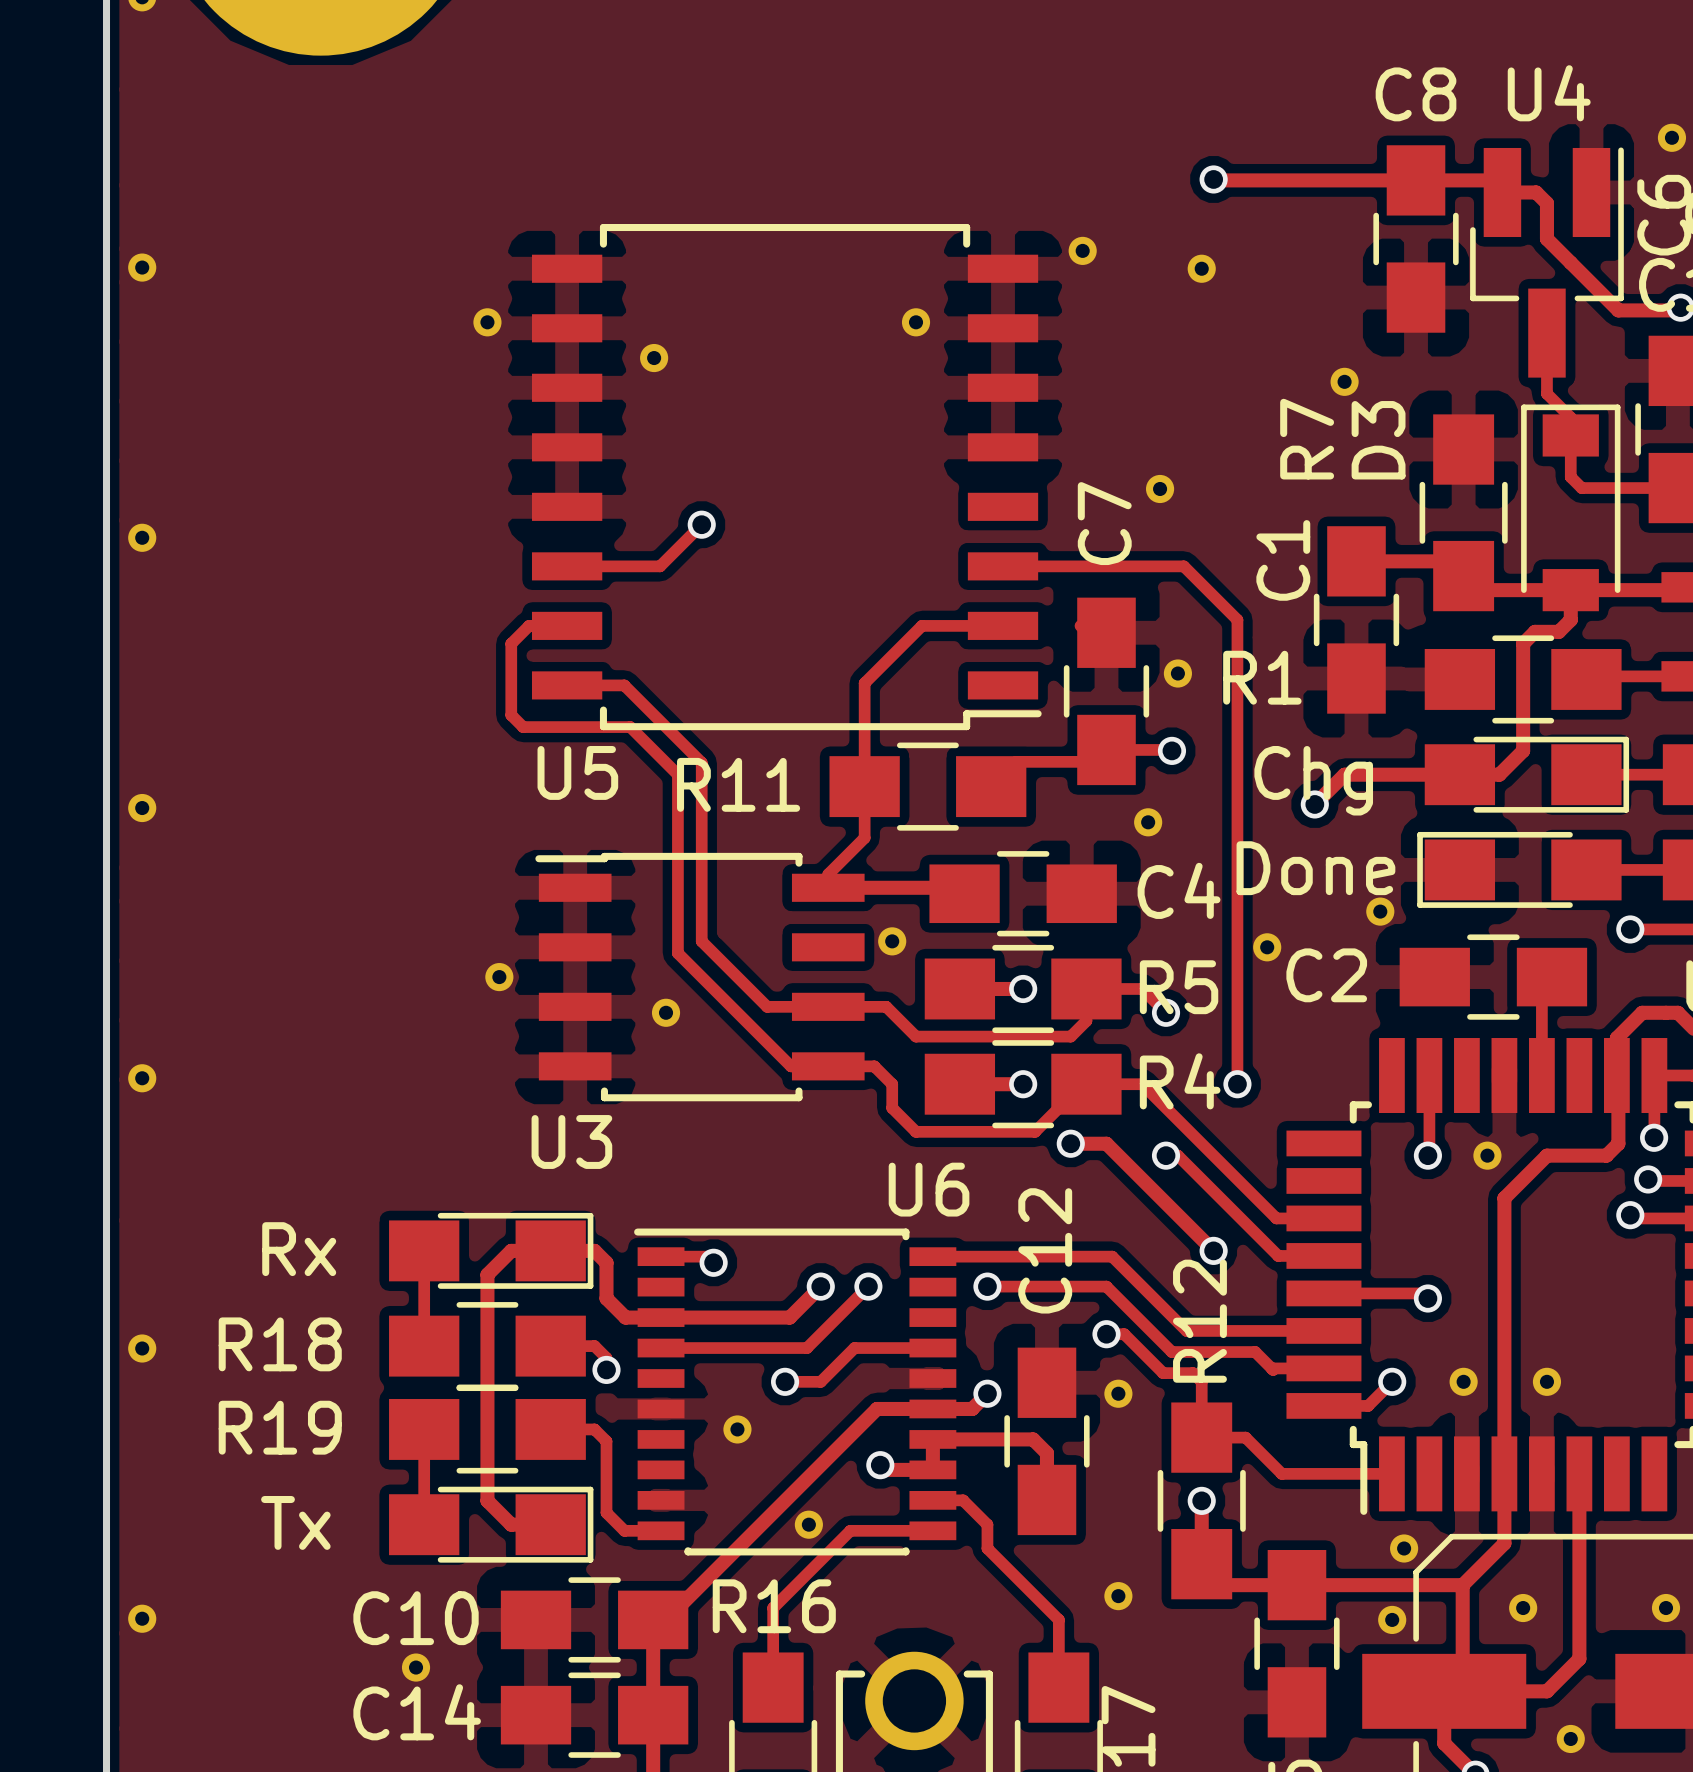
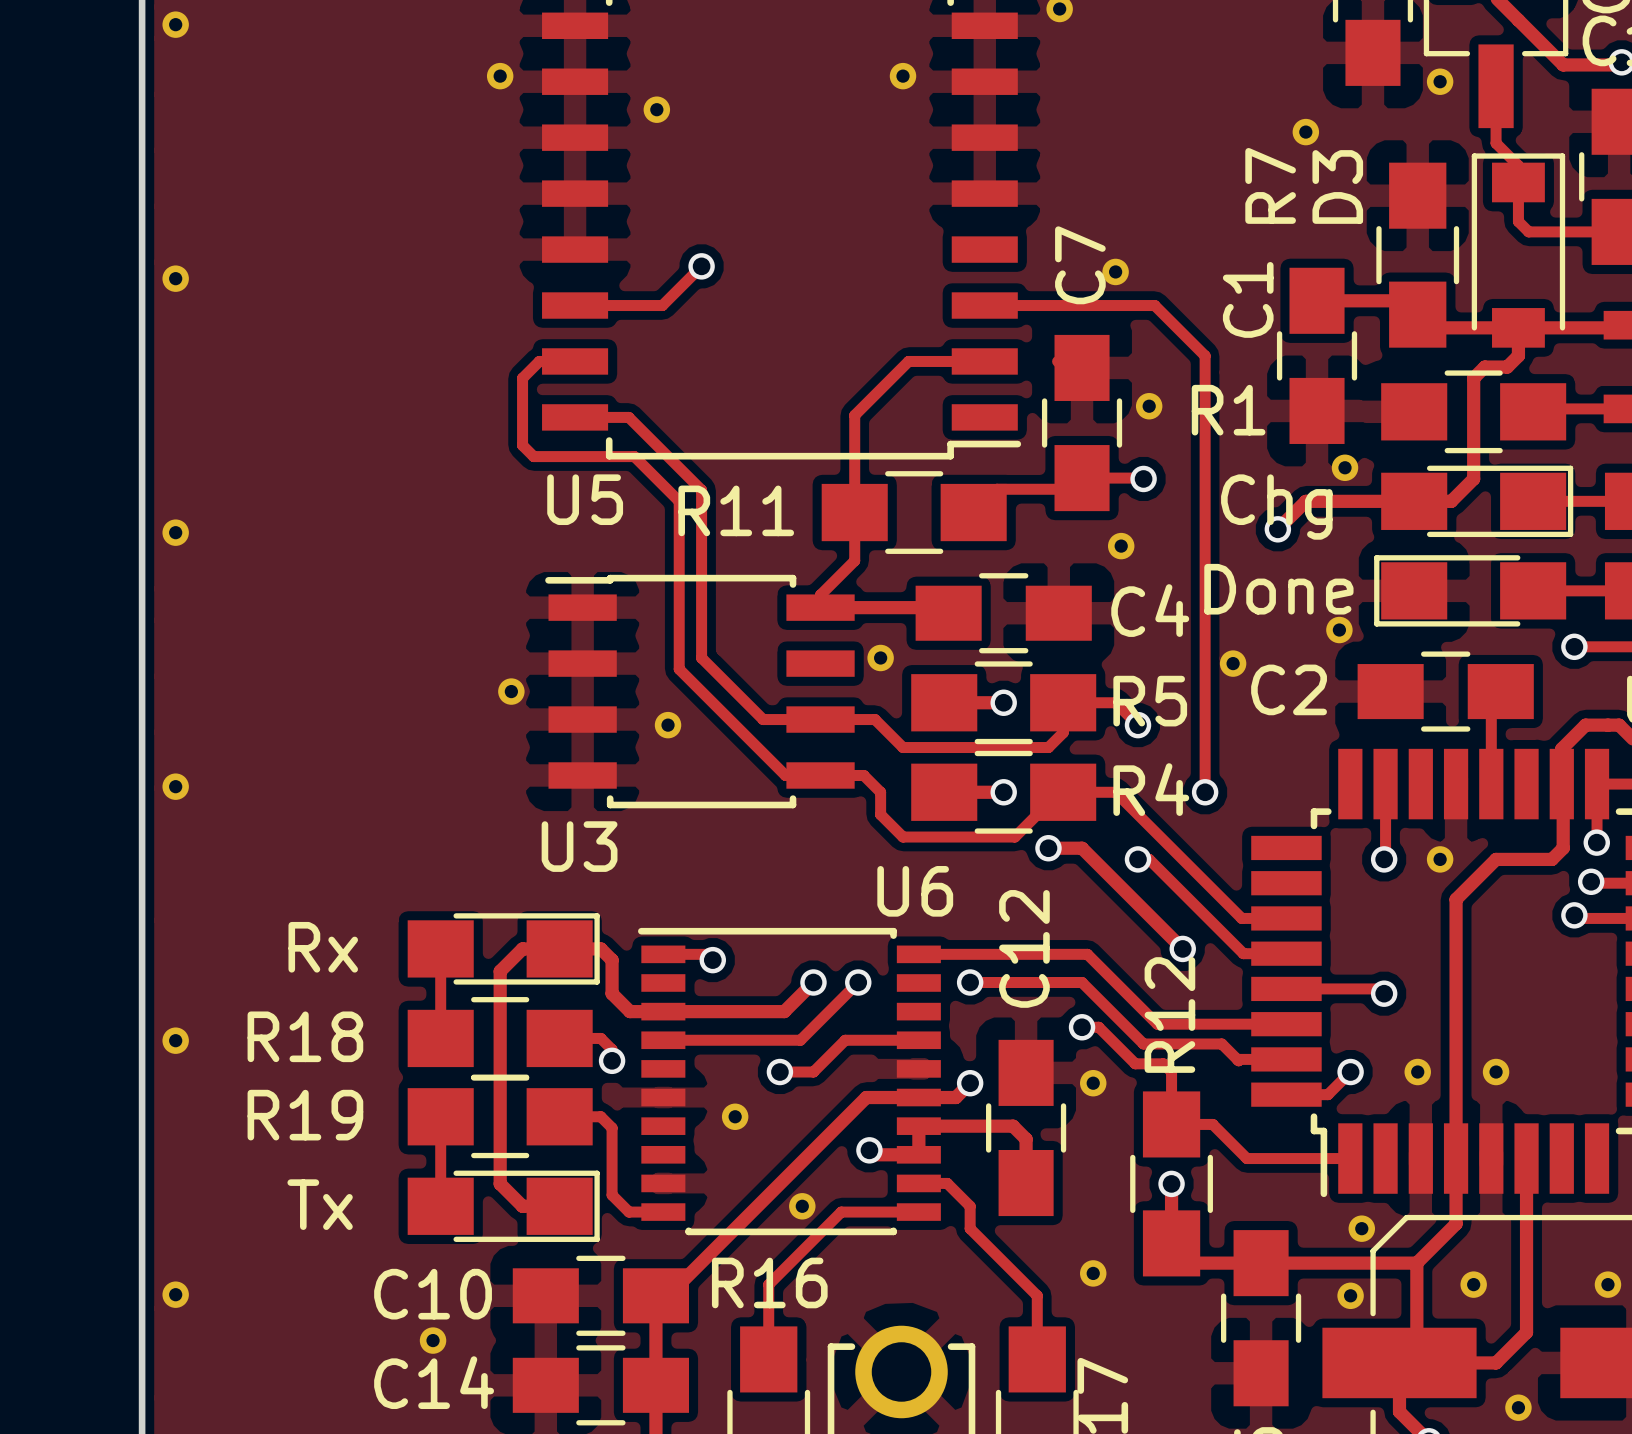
part: (1201, 268) -> none
part: none -> (1440, 81)
part position: (1160, 488) -> (1115, 271)
part: none -> (1345, 467)

